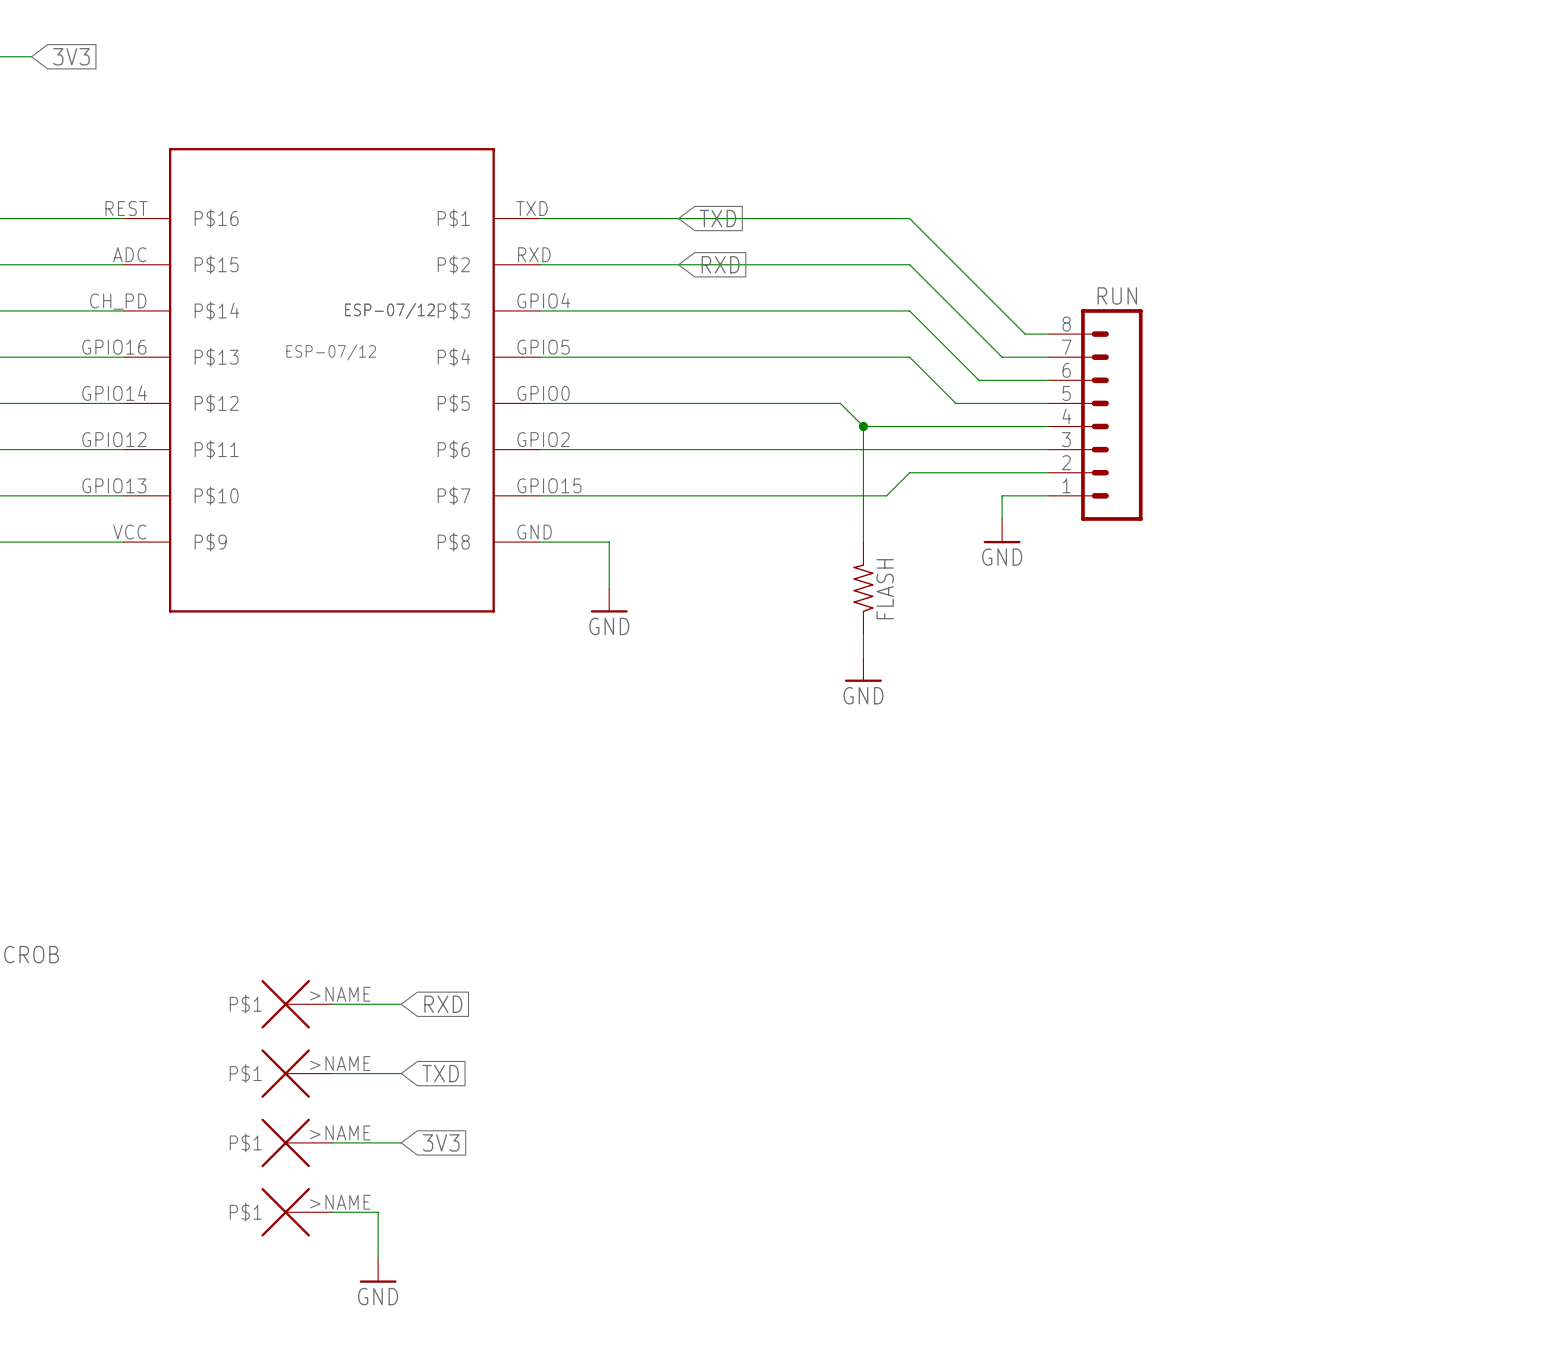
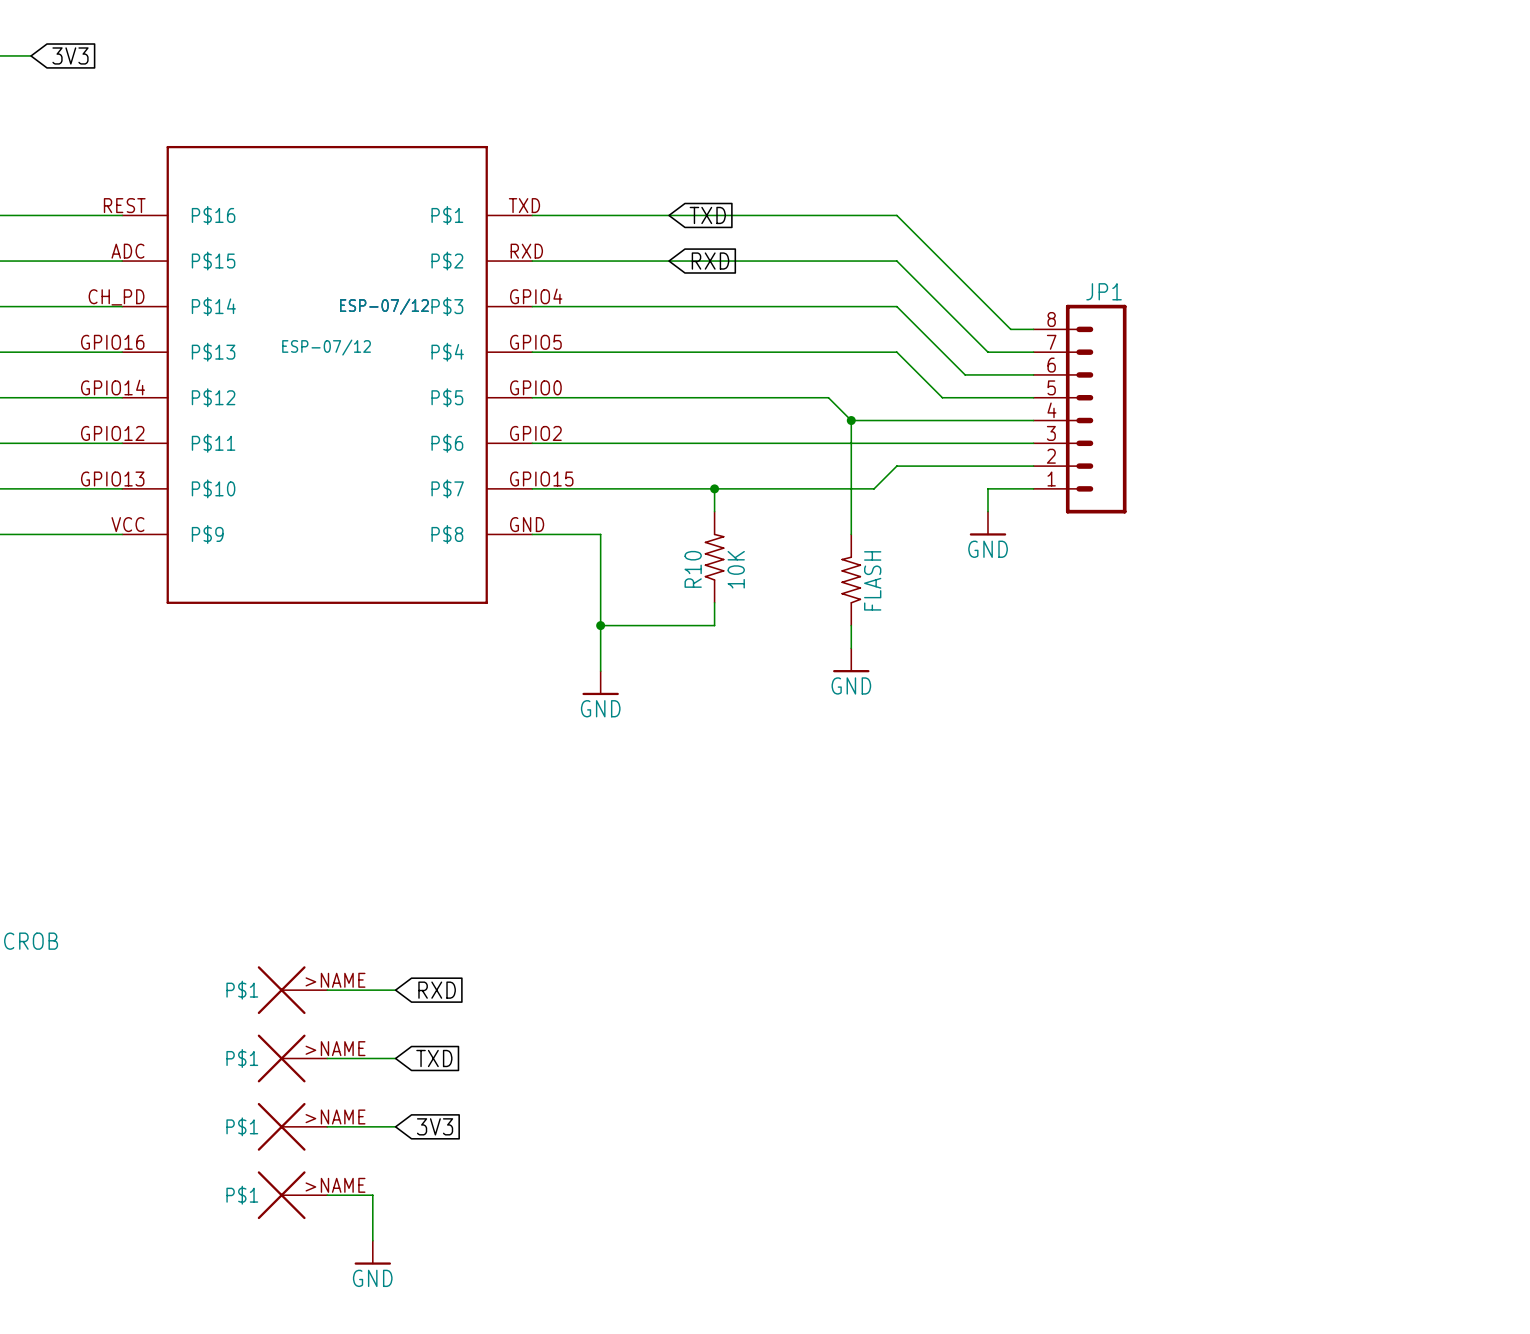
RUN name: RUN (1117, 295) -> JP1 (1104, 291)
wire: none -> (714, 488) (714, 511)
junction: none -> (714, 488)
R10: none -> 10K (714, 557)
wire: none -> (600, 580) (600, 671)
power symbol position: GND (609, 600) -> GND (600, 683)
wire: none -> (714, 602) (714, 625) (600, 625)
junction: none -> (600, 625)

